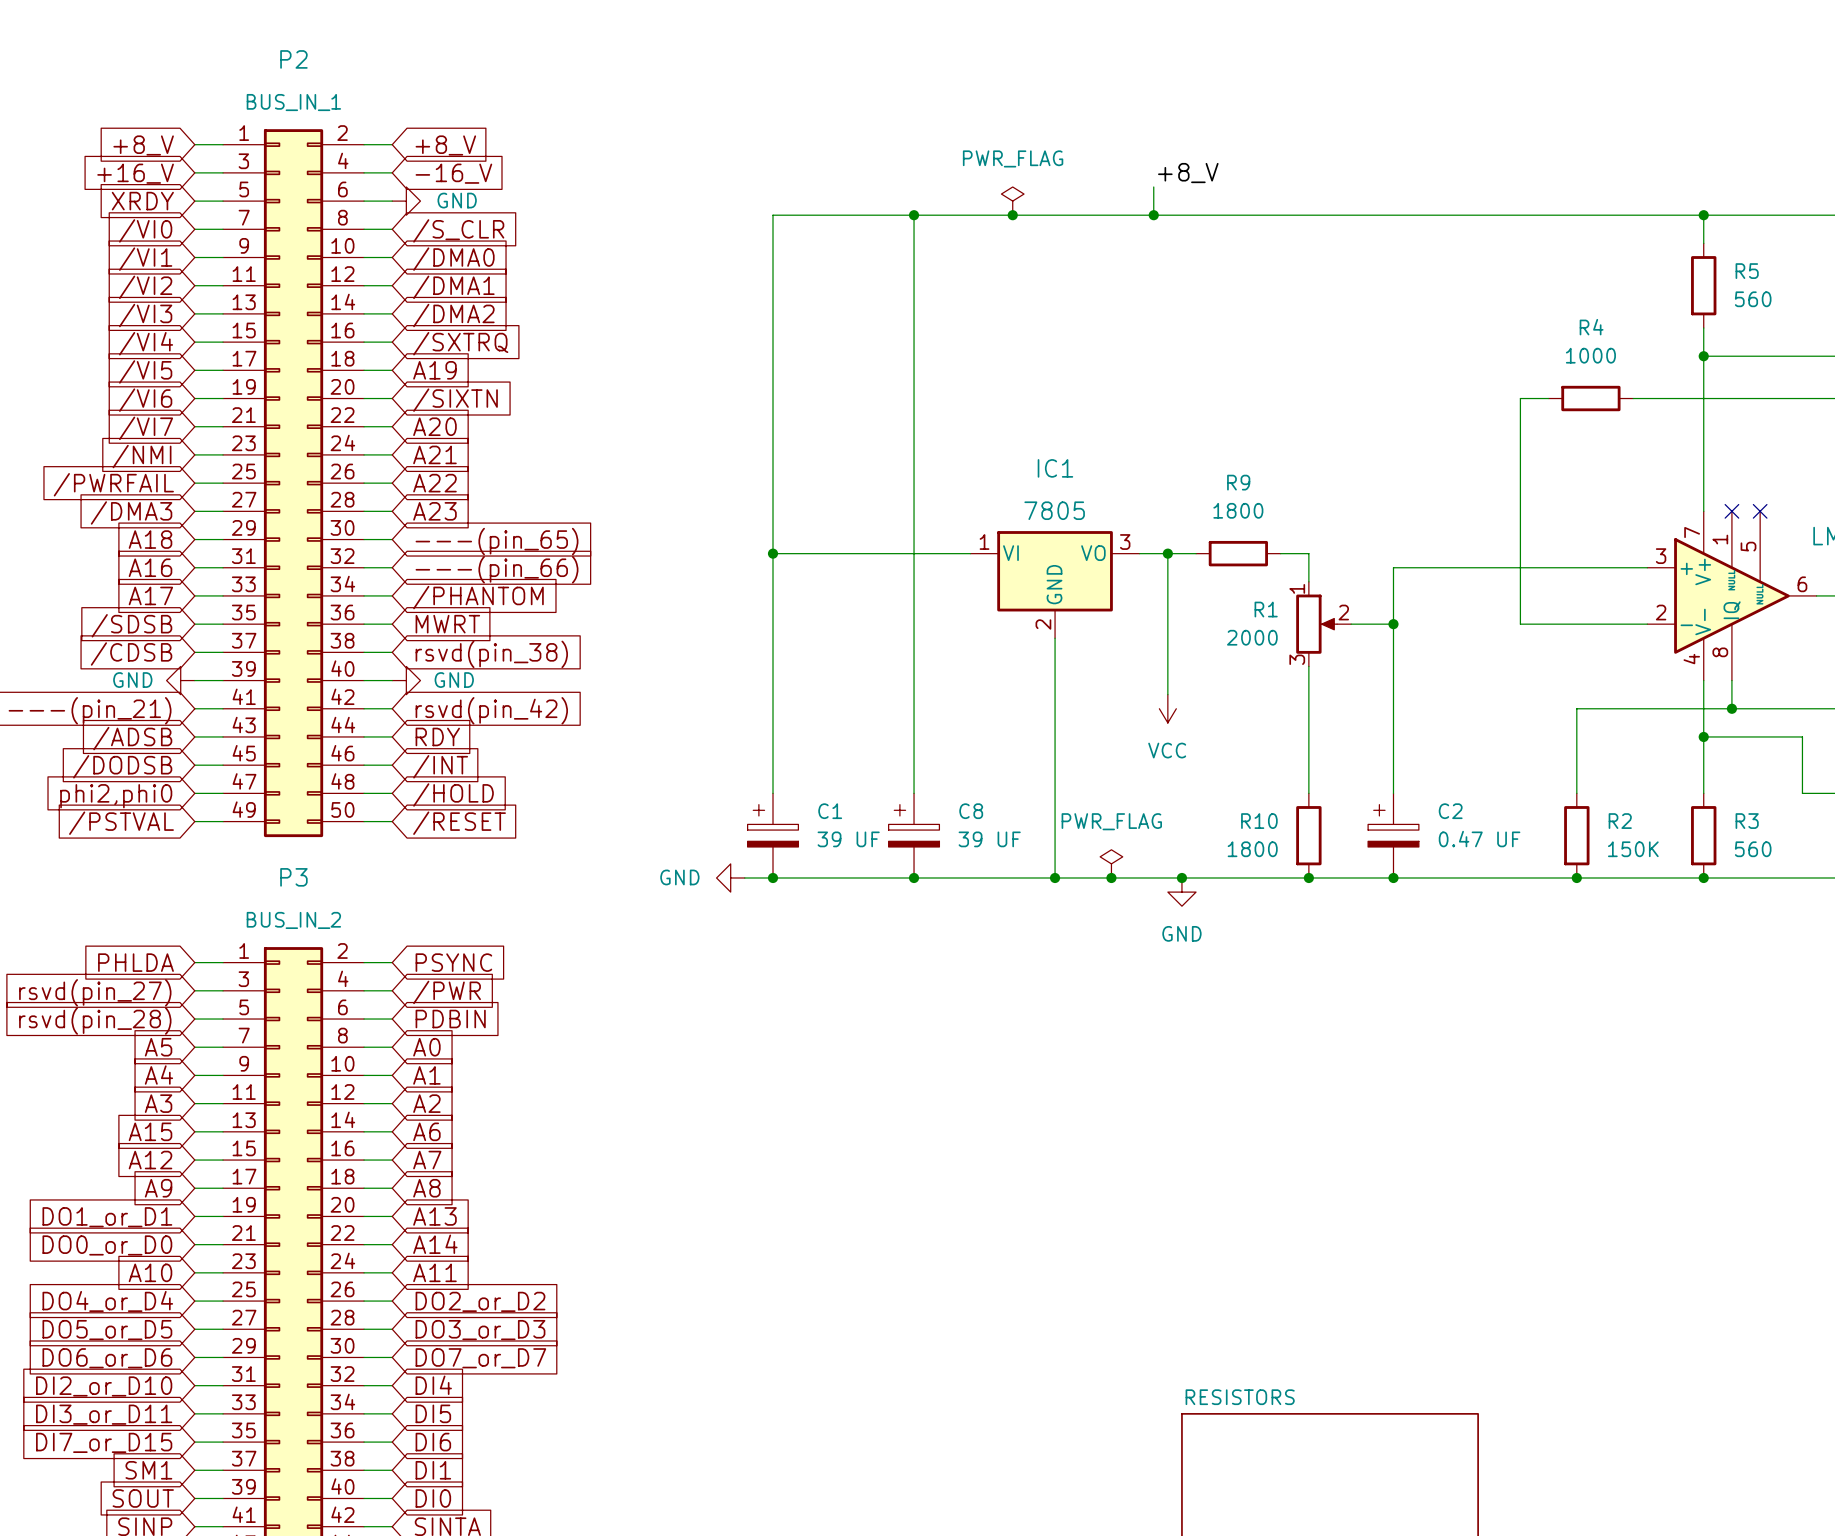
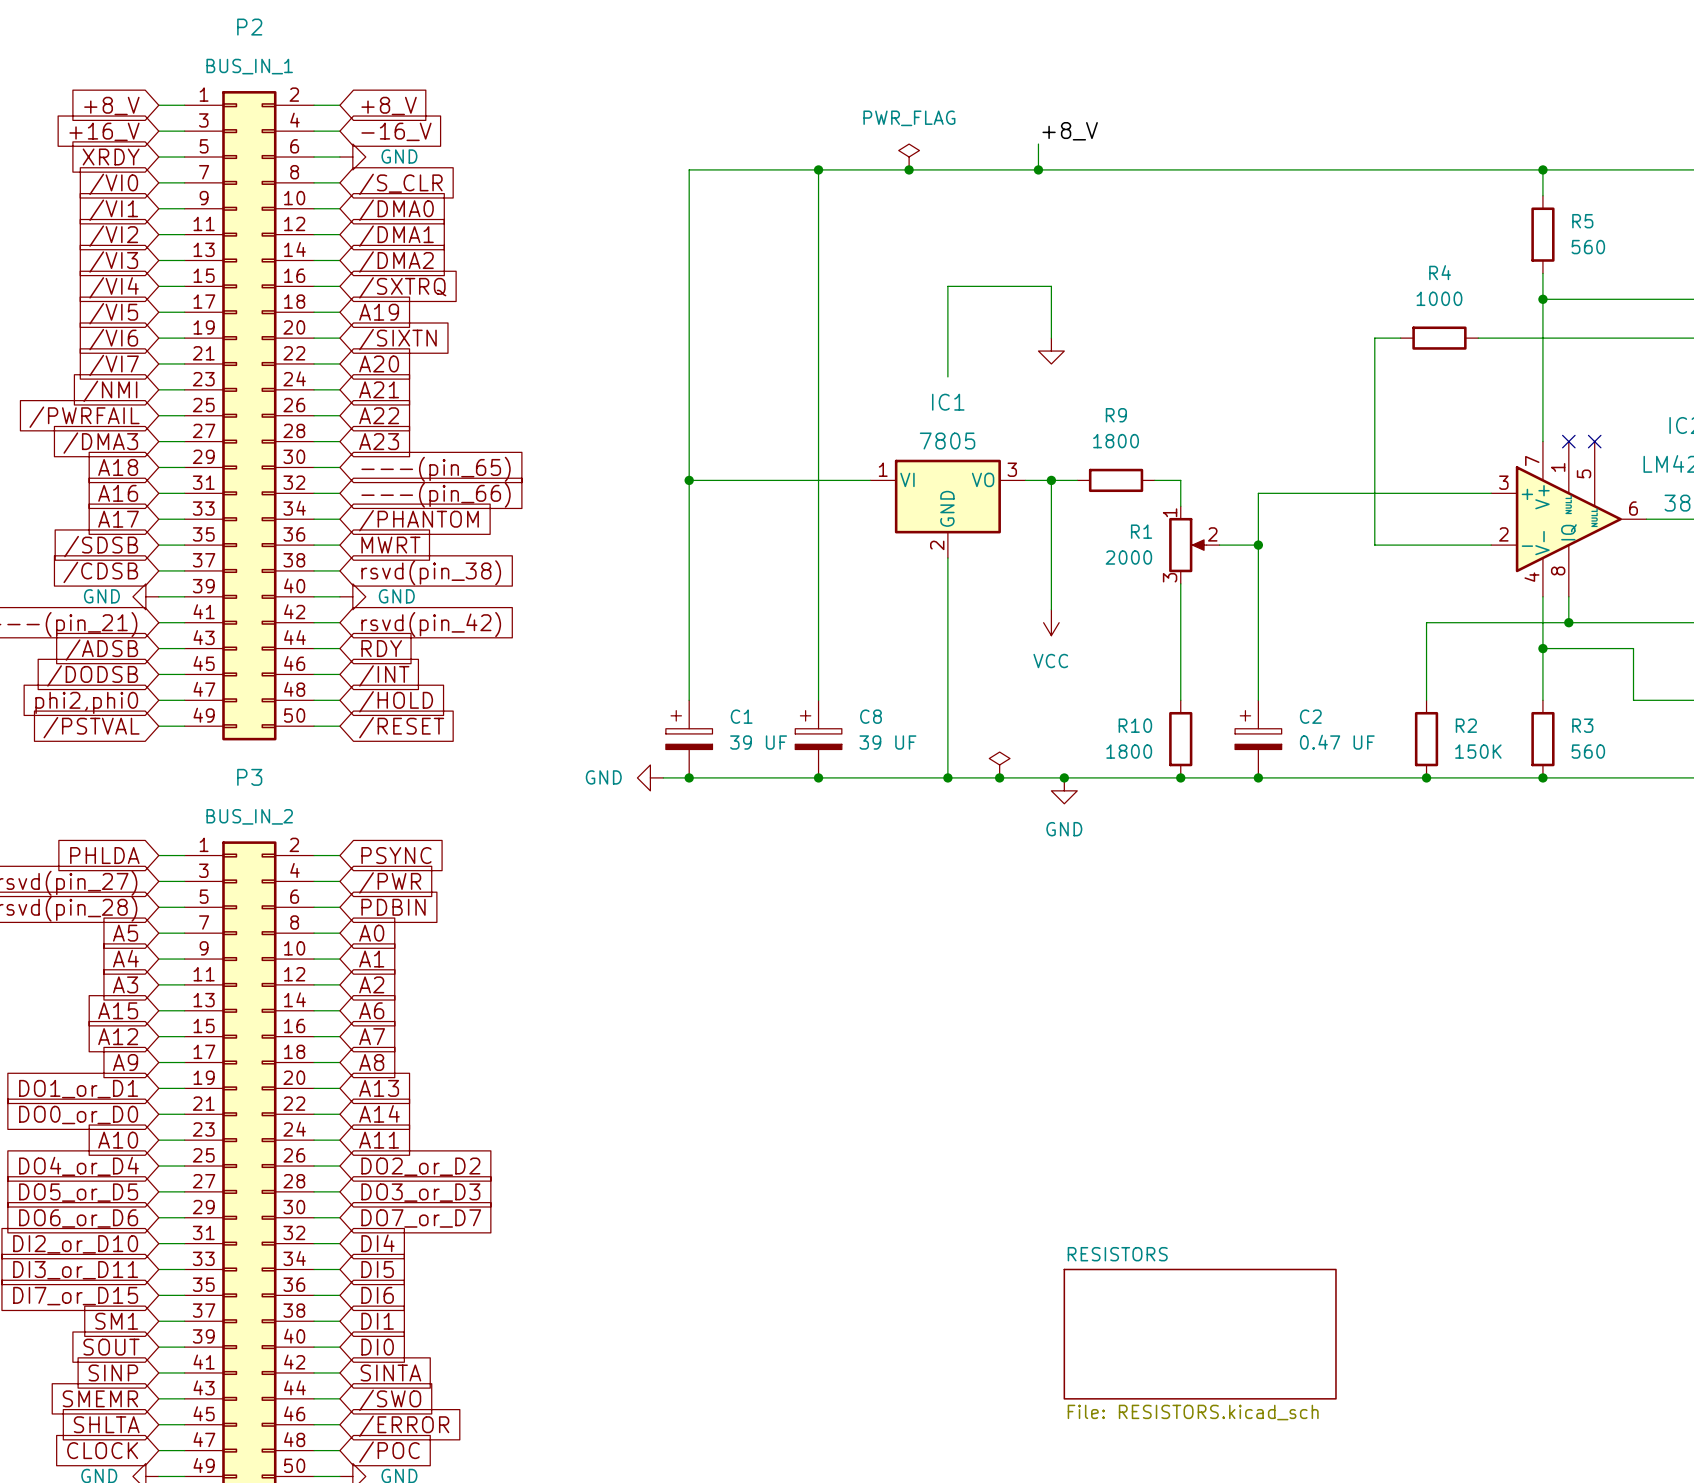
wire: none -> (1051, 338) (1051, 286) (947, 286) (947, 376)
power symbol: none -> (1051, 351)
power symbol text: PWR_FLAG (1111, 821) -> none

